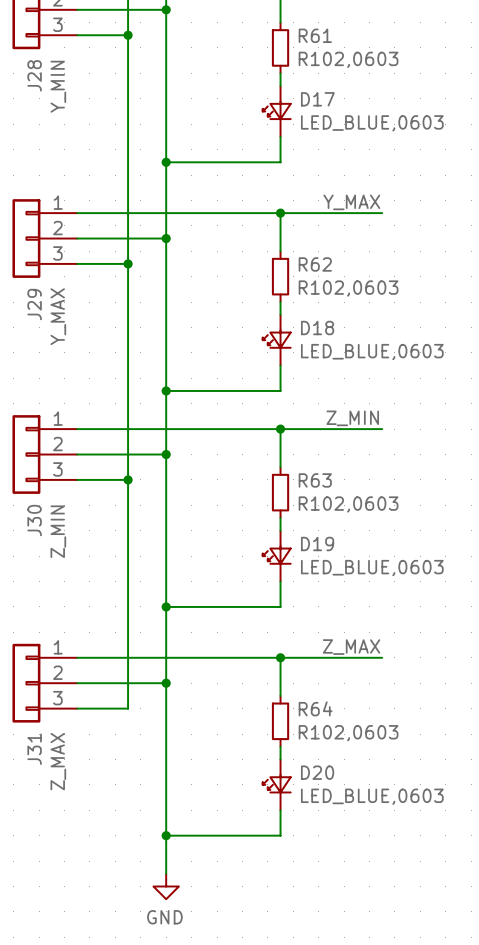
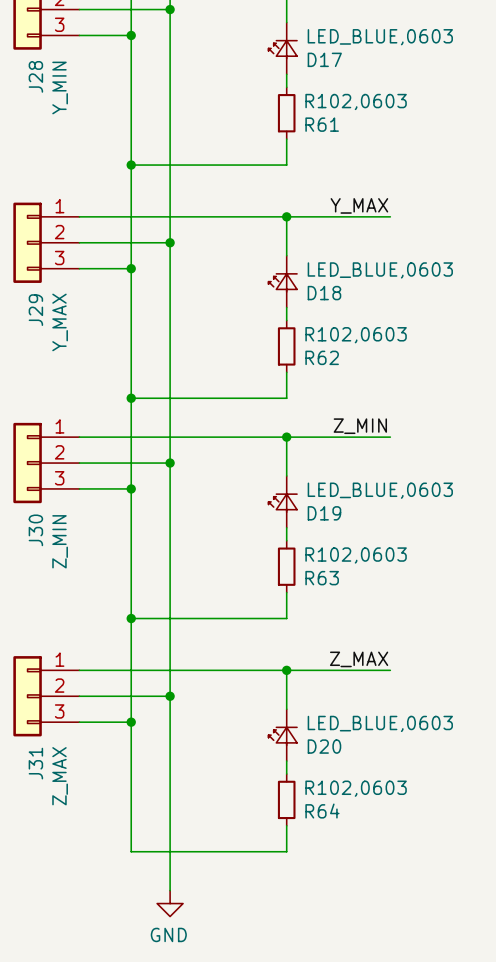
R61 name position: R61 (315, 35) -> R61 (322, 124)
R61 position: (280, 47) -> (286, 113)
R61 value position: R102,0603 (348, 59) -> R102,0603 (356, 101)
D17 flip: as is (276, 110) -> up-down (282, 49)
D17 position: (276, 111) -> (282, 48)
wire: none -> (131, 165) (170, 165)
junction position: (166, 162) -> (131, 165)
R62 name position: R62 (315, 264) -> R62 (322, 357)
R62 position: (280, 276) -> (286, 346)
R62 value position: R102,0603 (348, 288) -> R102,0603 (356, 335)
D18 flip: as is (276, 338) -> up-down (282, 282)
D18 position: (276, 340) -> (282, 281)
wire: none -> (131, 398) (170, 398)
junction position: (166, 390) -> (131, 398)
R63 name position: R63 (315, 480) -> R63 (322, 578)
R63 position: (280, 492) -> (286, 566)
R63 value position: R102,0603 (348, 504) -> R102,0603 (356, 555)
D19 flip: as is (276, 554) -> up-down (282, 503)
D19 position: (276, 556) -> (282, 501)
wire: none -> (131, 618) (170, 618)
junction position: (166, 606) -> (131, 618)
wire: none -> (131, 722) (131, 851) (170, 851)
junction: none -> (131, 722)
R64 name position: R64 (315, 708) -> R64 (322, 811)
R64 position: (280, 721) -> (286, 799)
R64 value position: R102,0603 (348, 733) -> R102,0603 (356, 788)
D20 flip: as is (276, 783) -> up-down (282, 736)
D20 position: (276, 784) -> (282, 735)
junction: (166, 835) -> none

